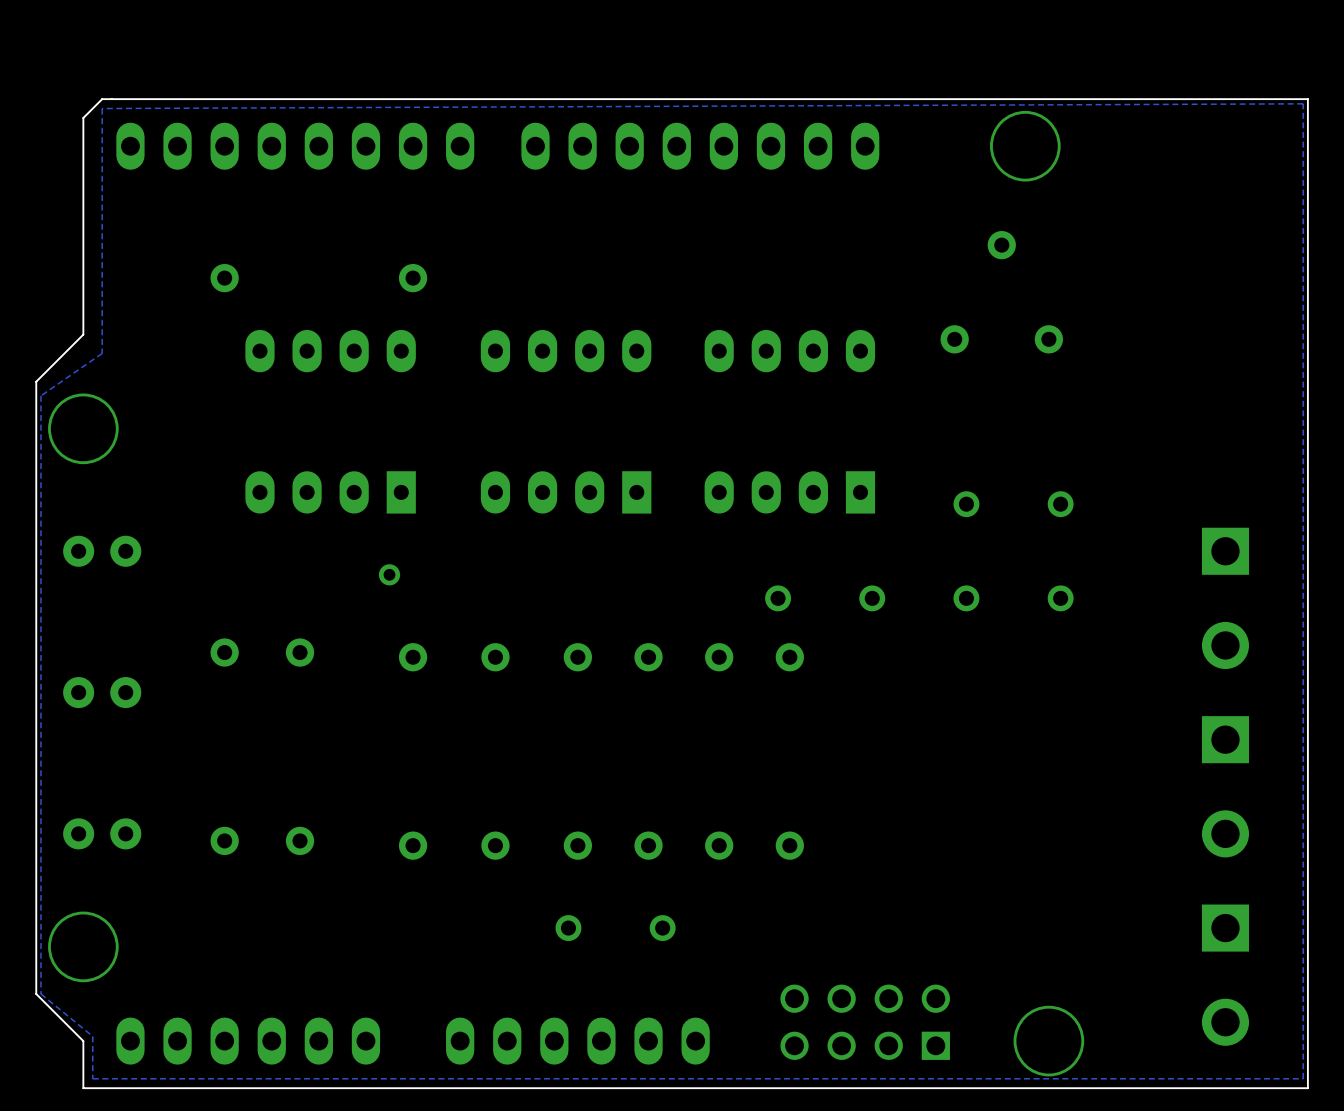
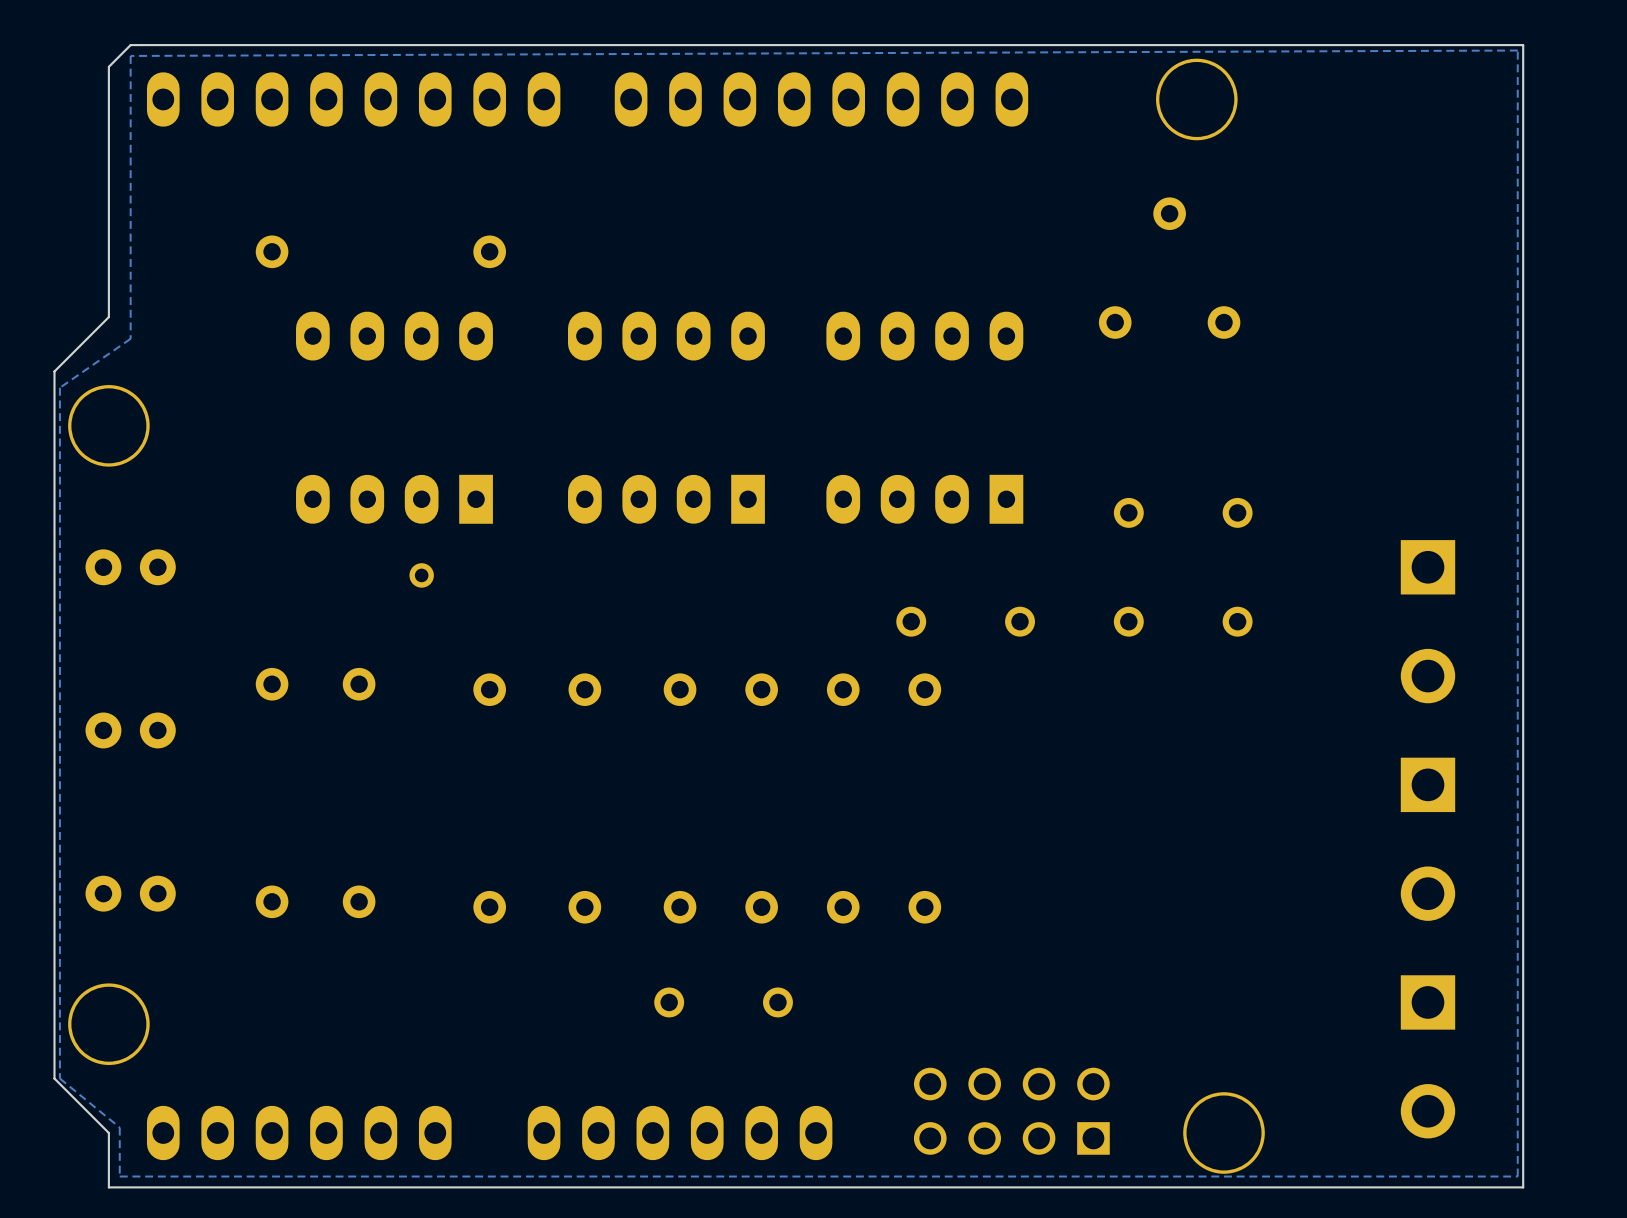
part position: (389, 574) -> (421, 575)

